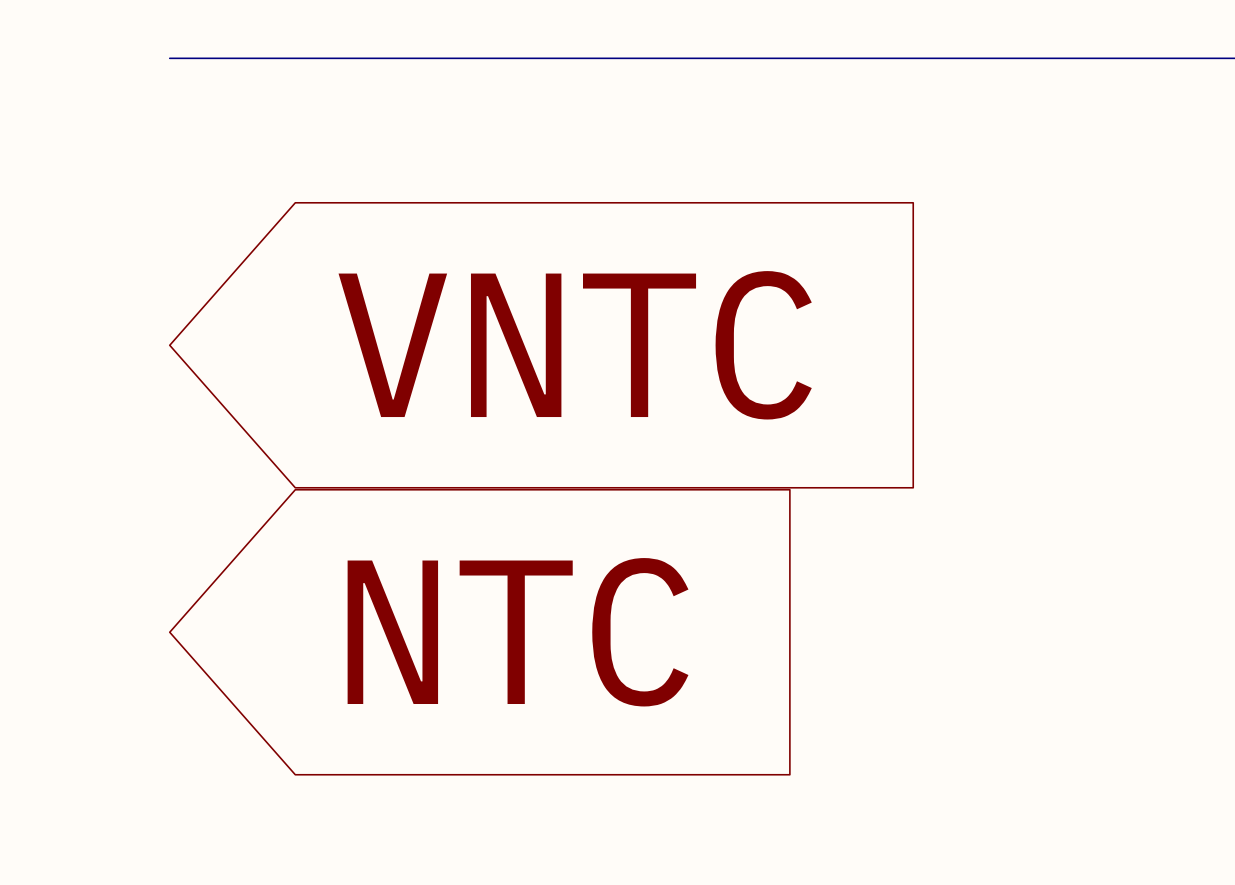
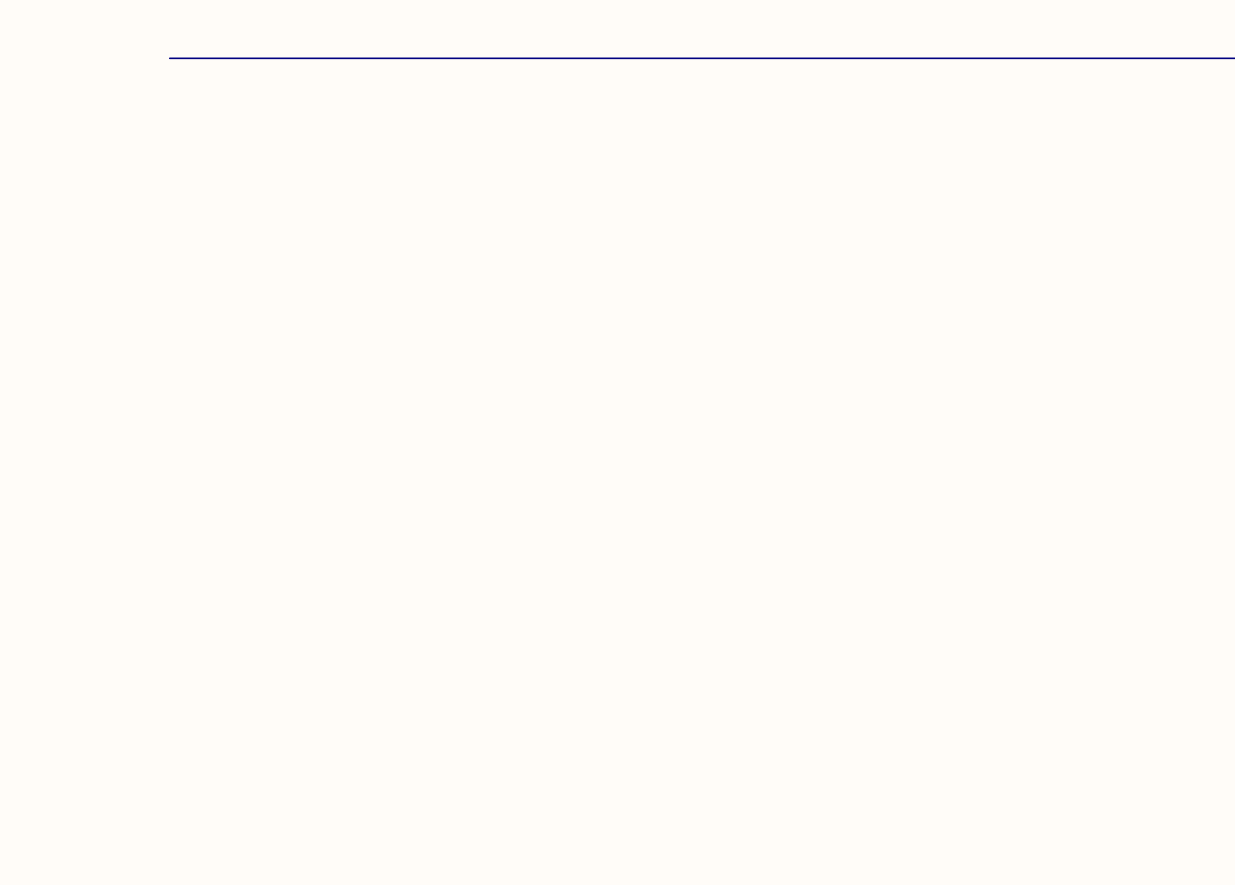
global label: VNTC (575, 345) -> none
global label: NTC (518, 632) -> none

